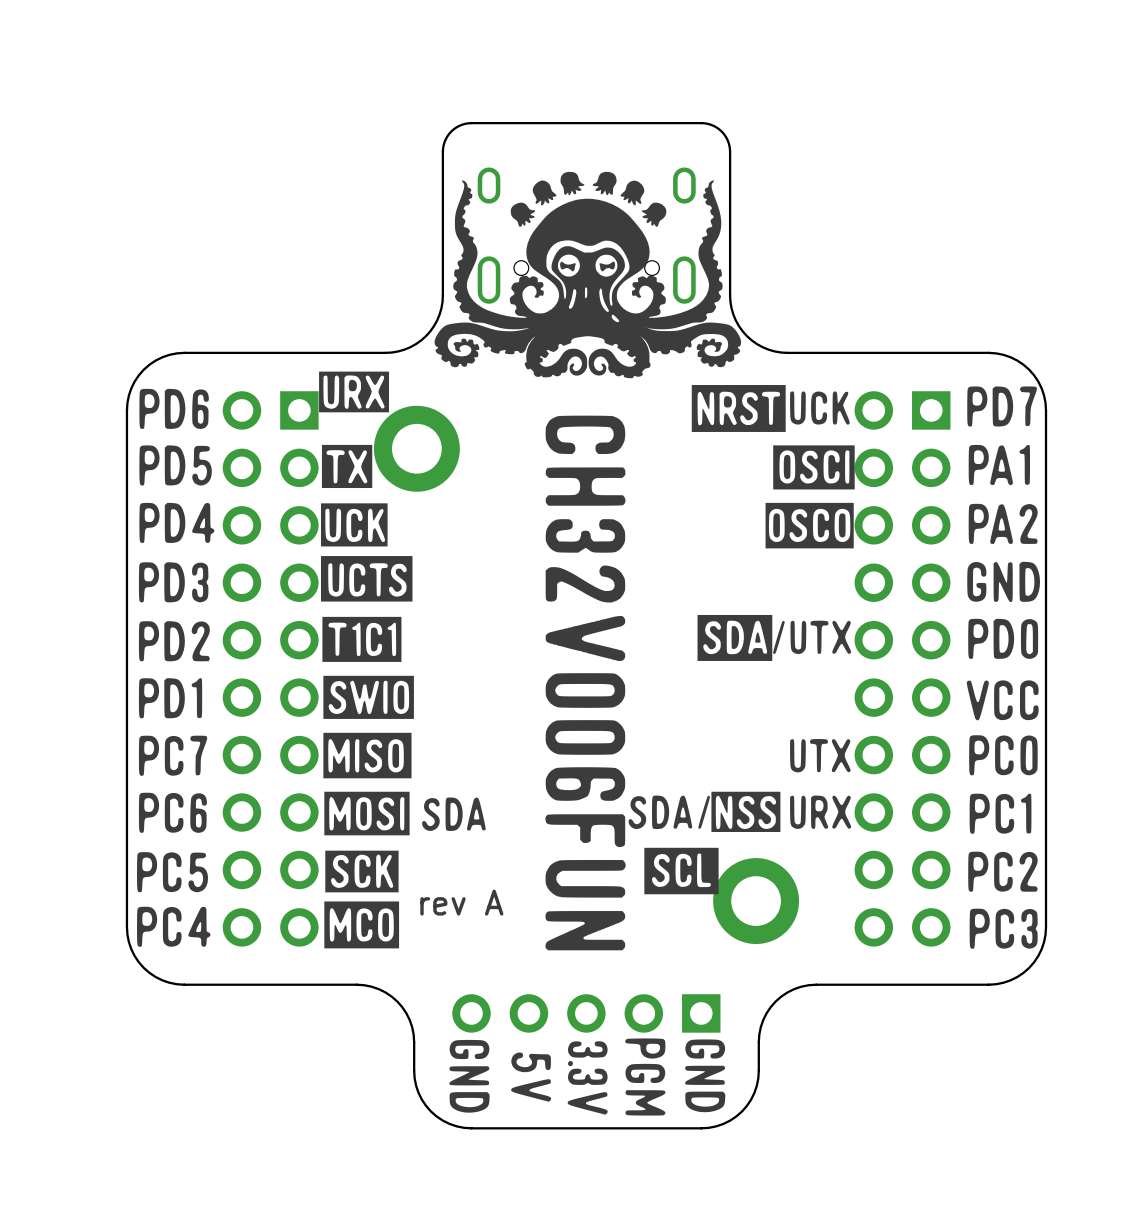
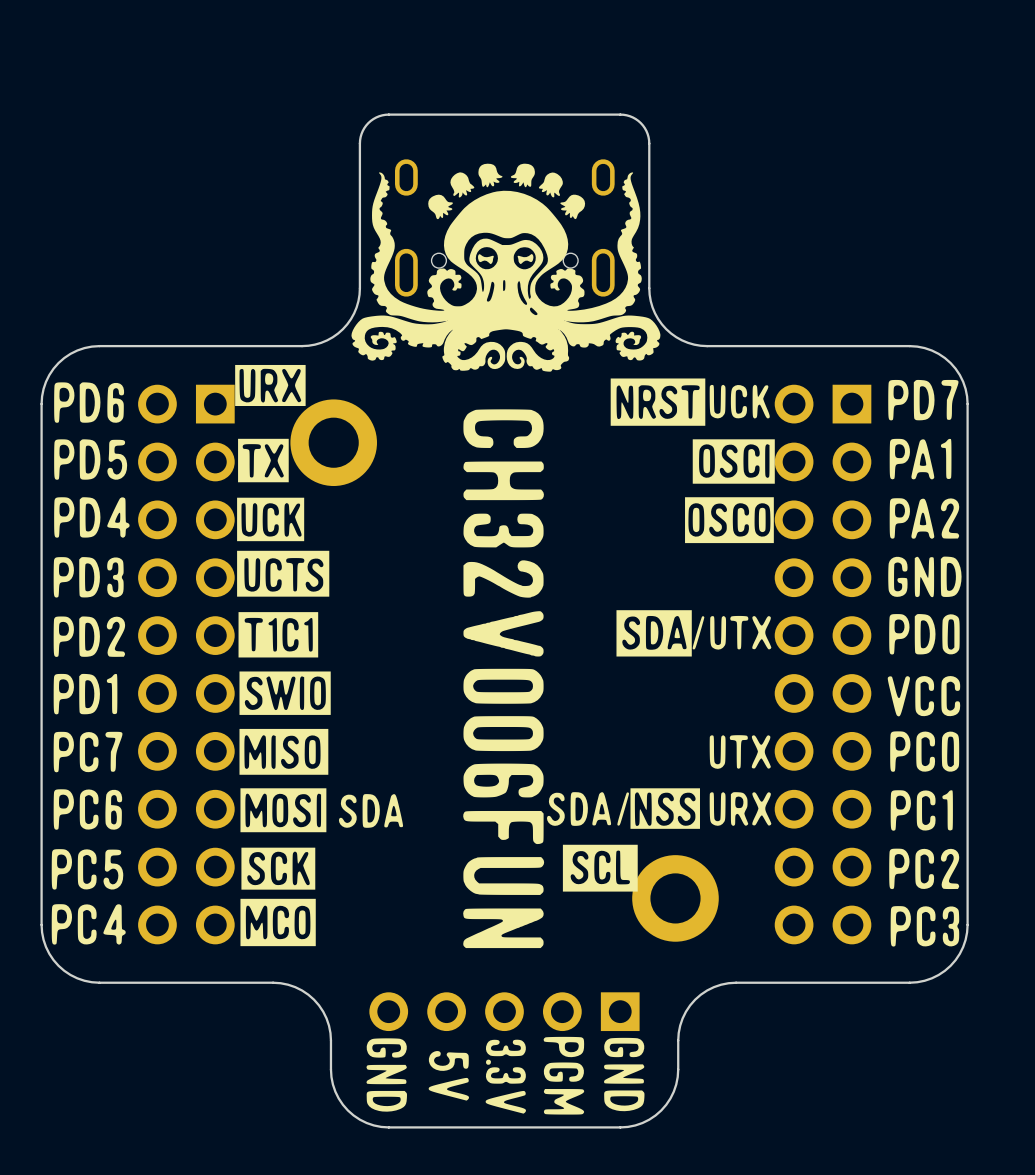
text: rev A (461, 902) -> none

